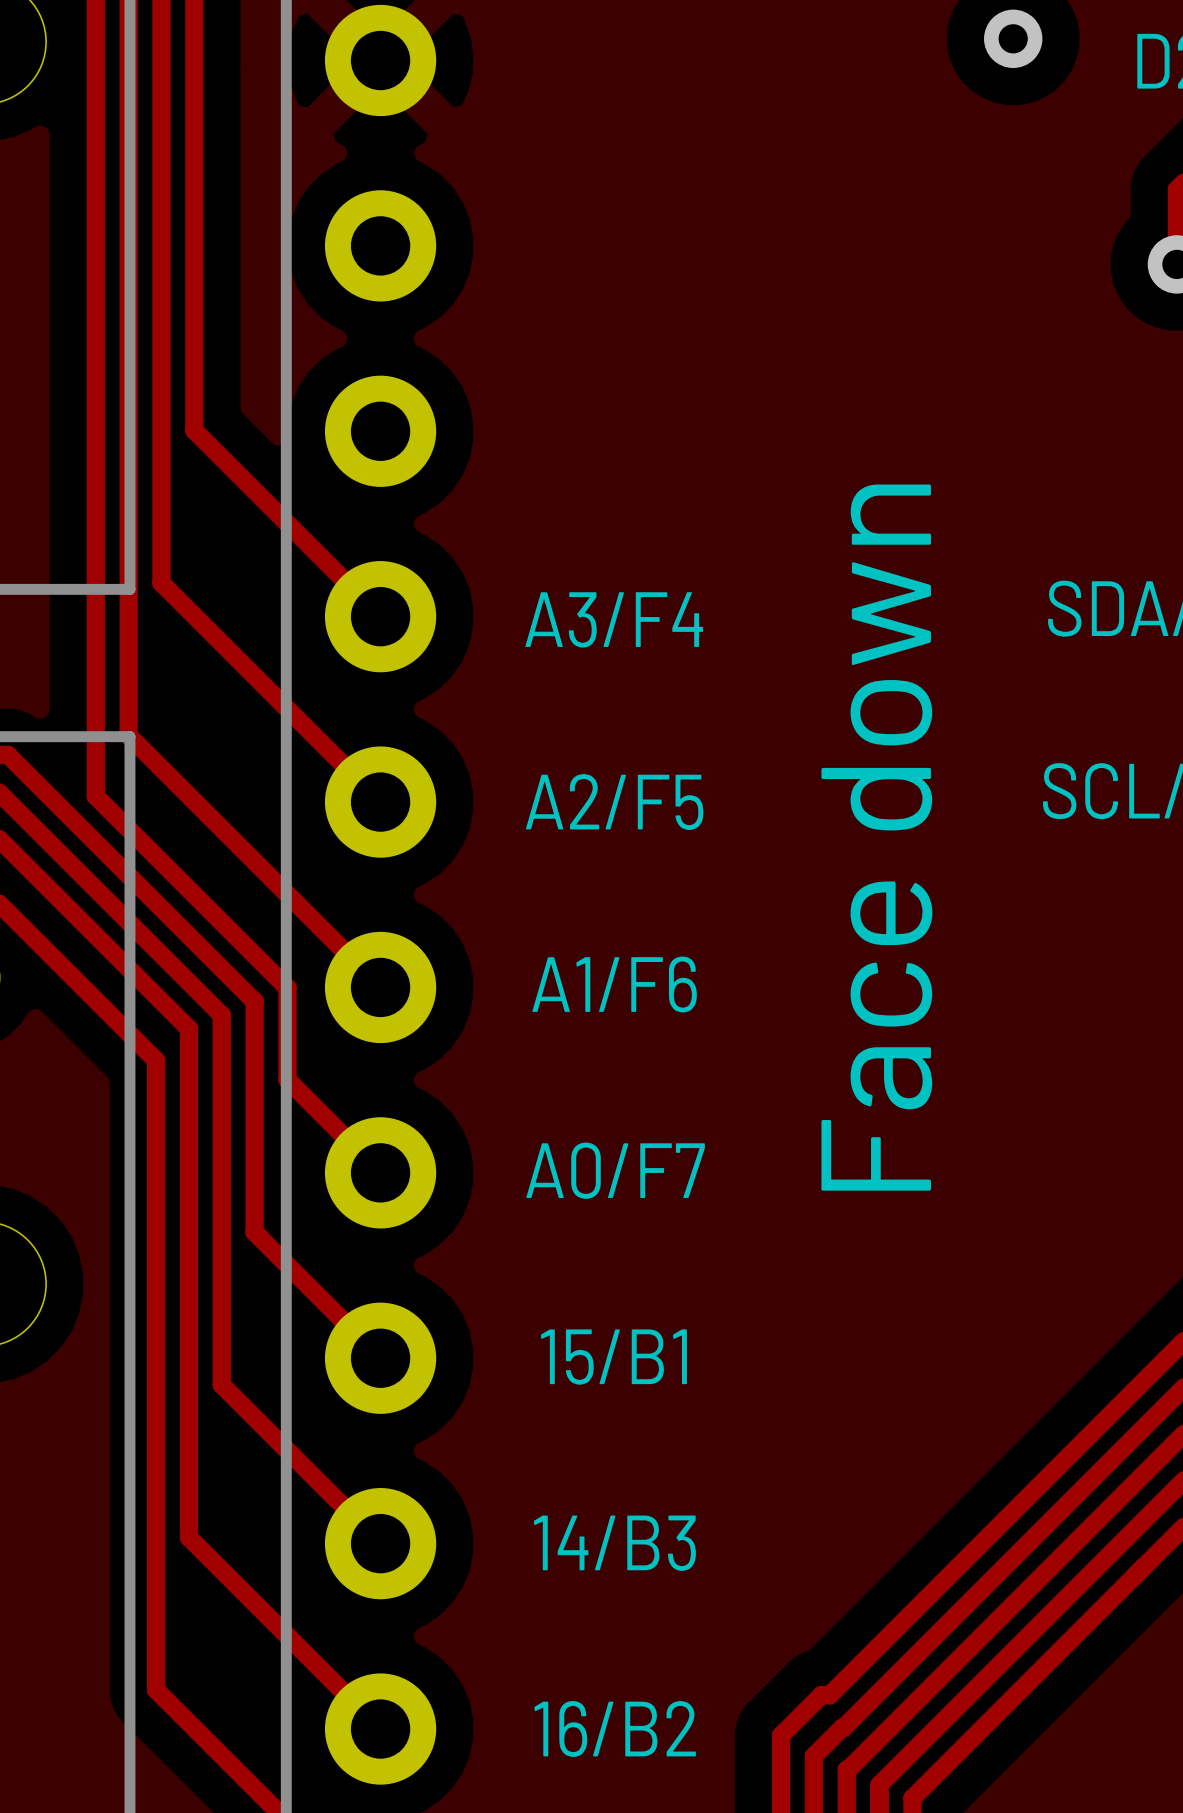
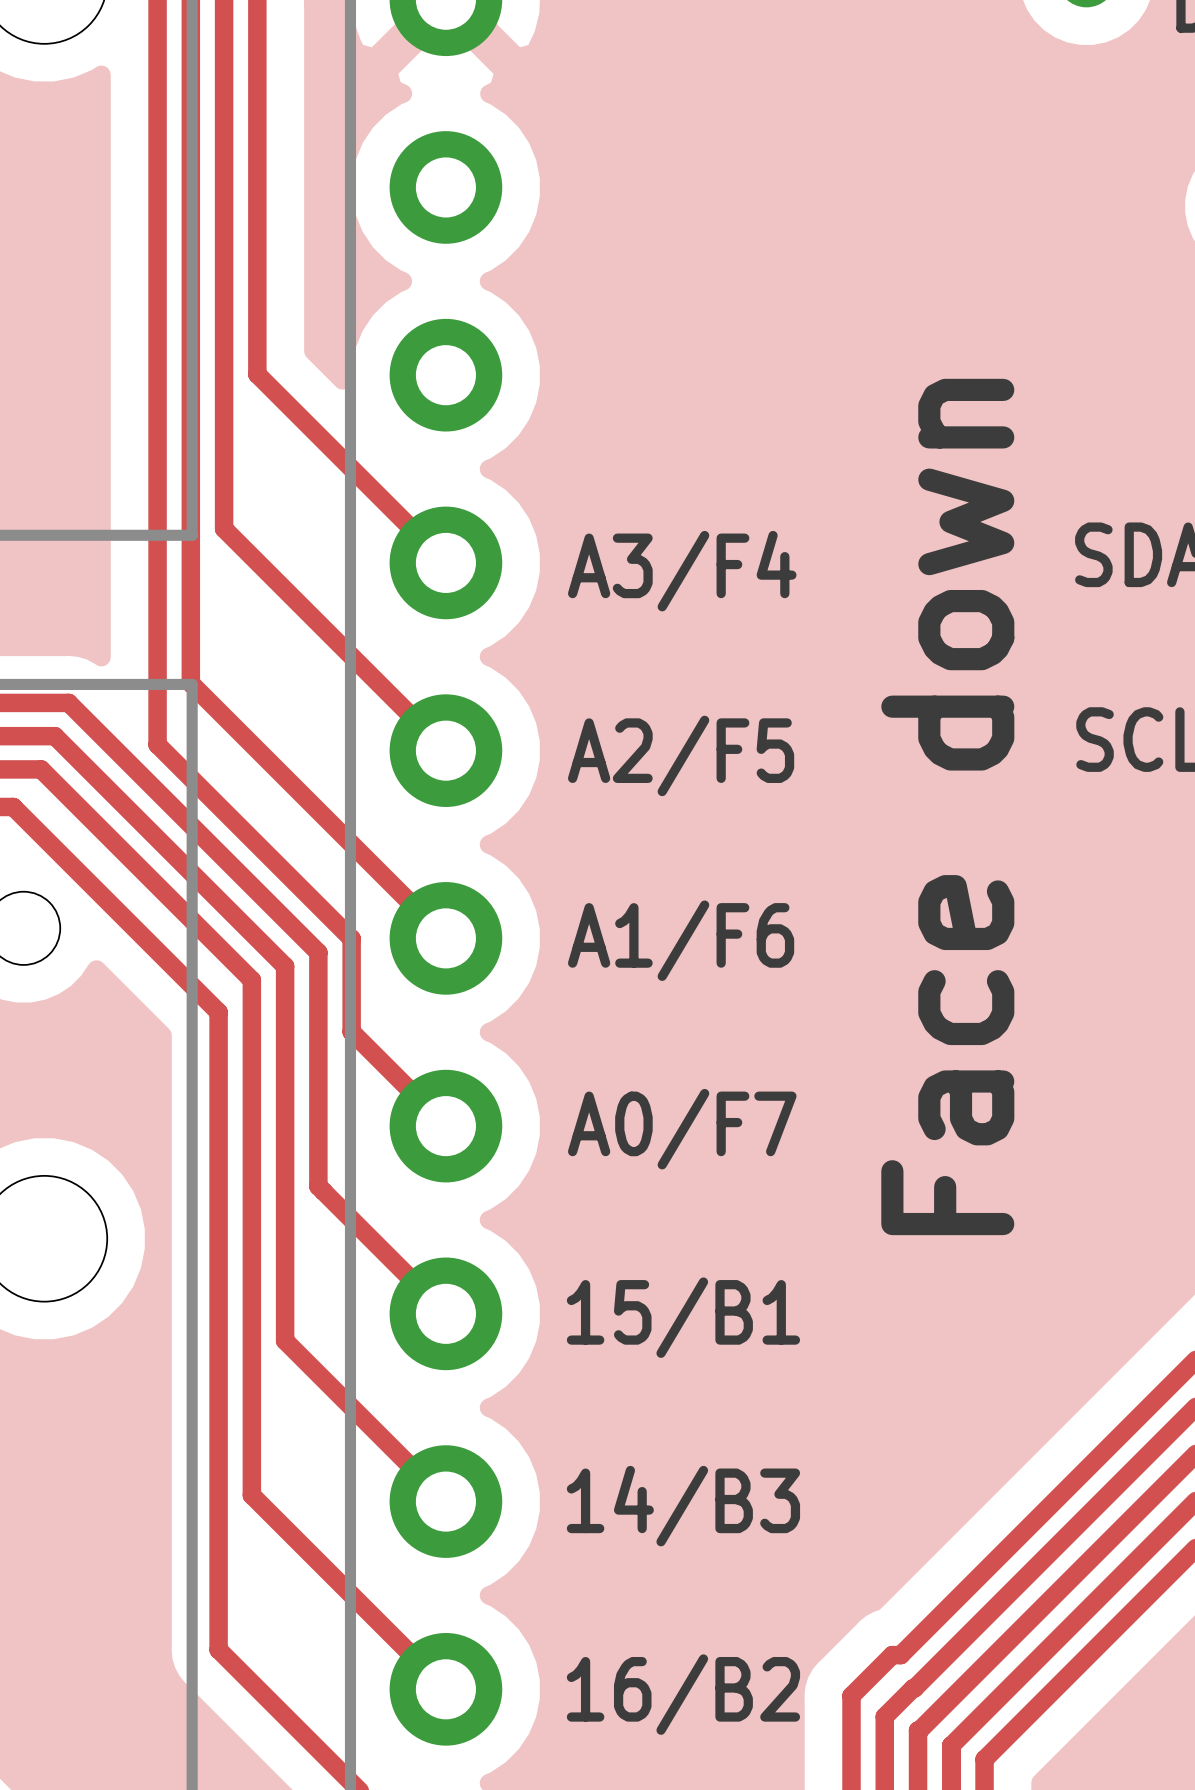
text position: Face down (876, 837) -> Face down (947, 806)

